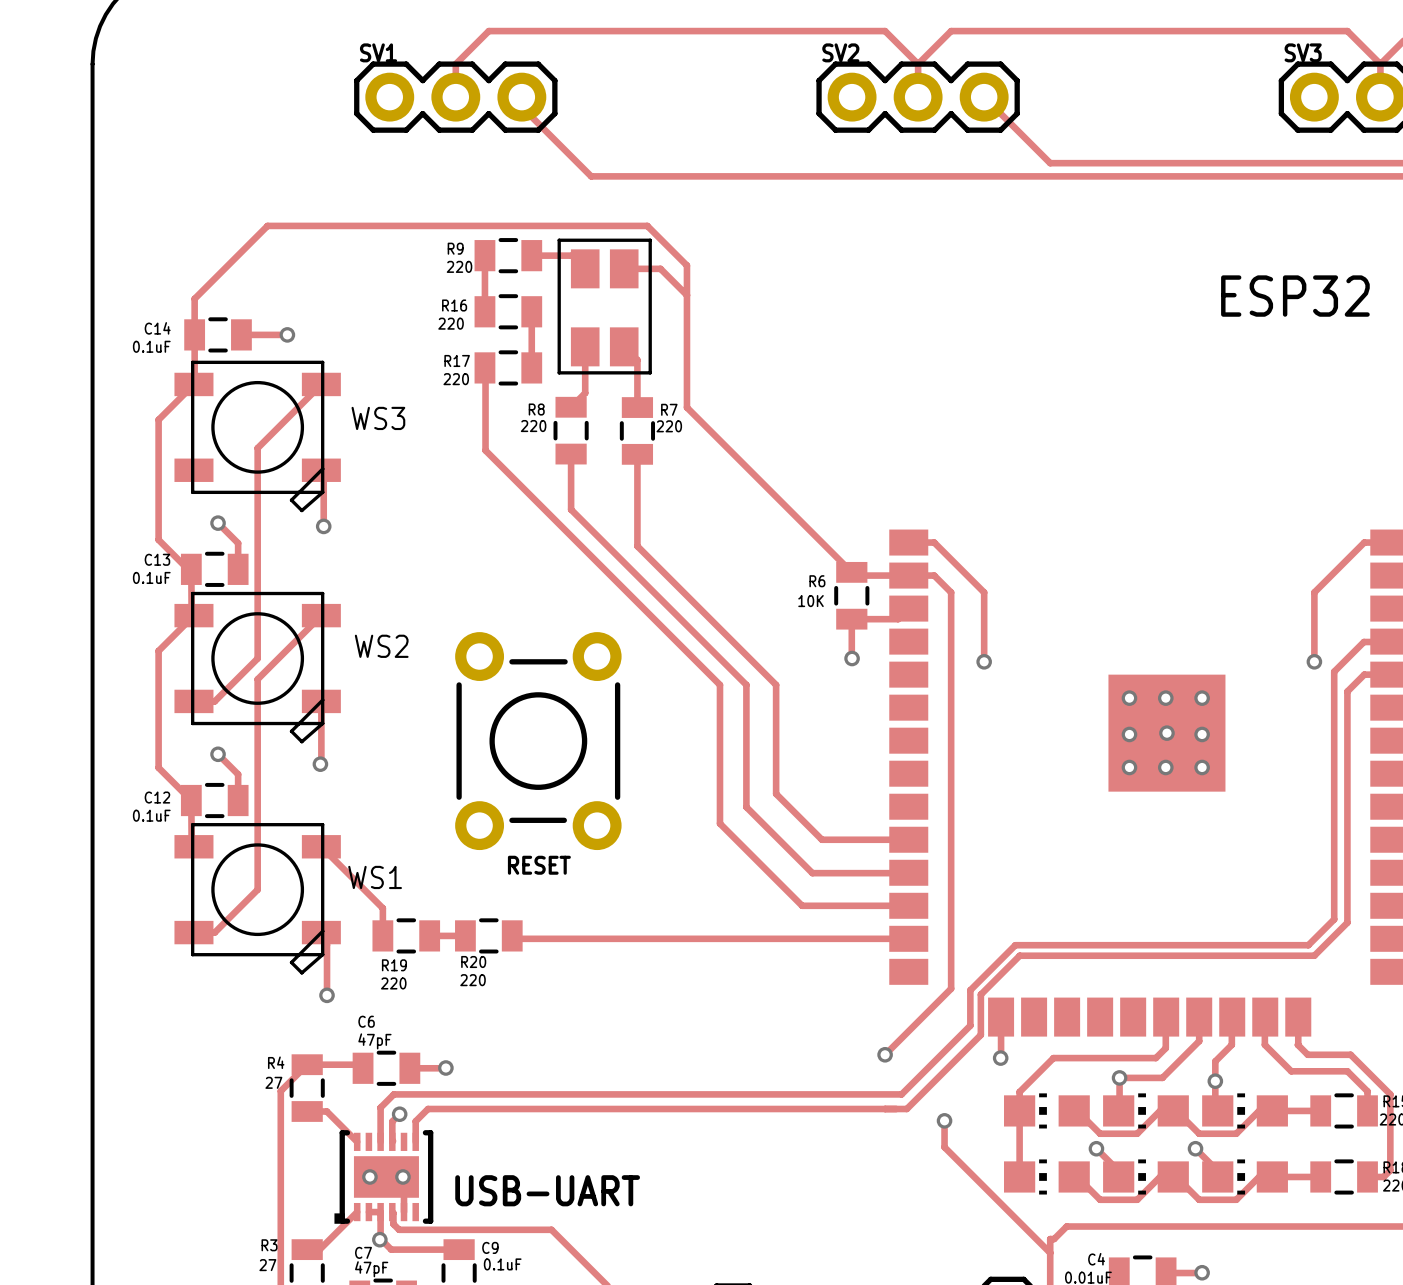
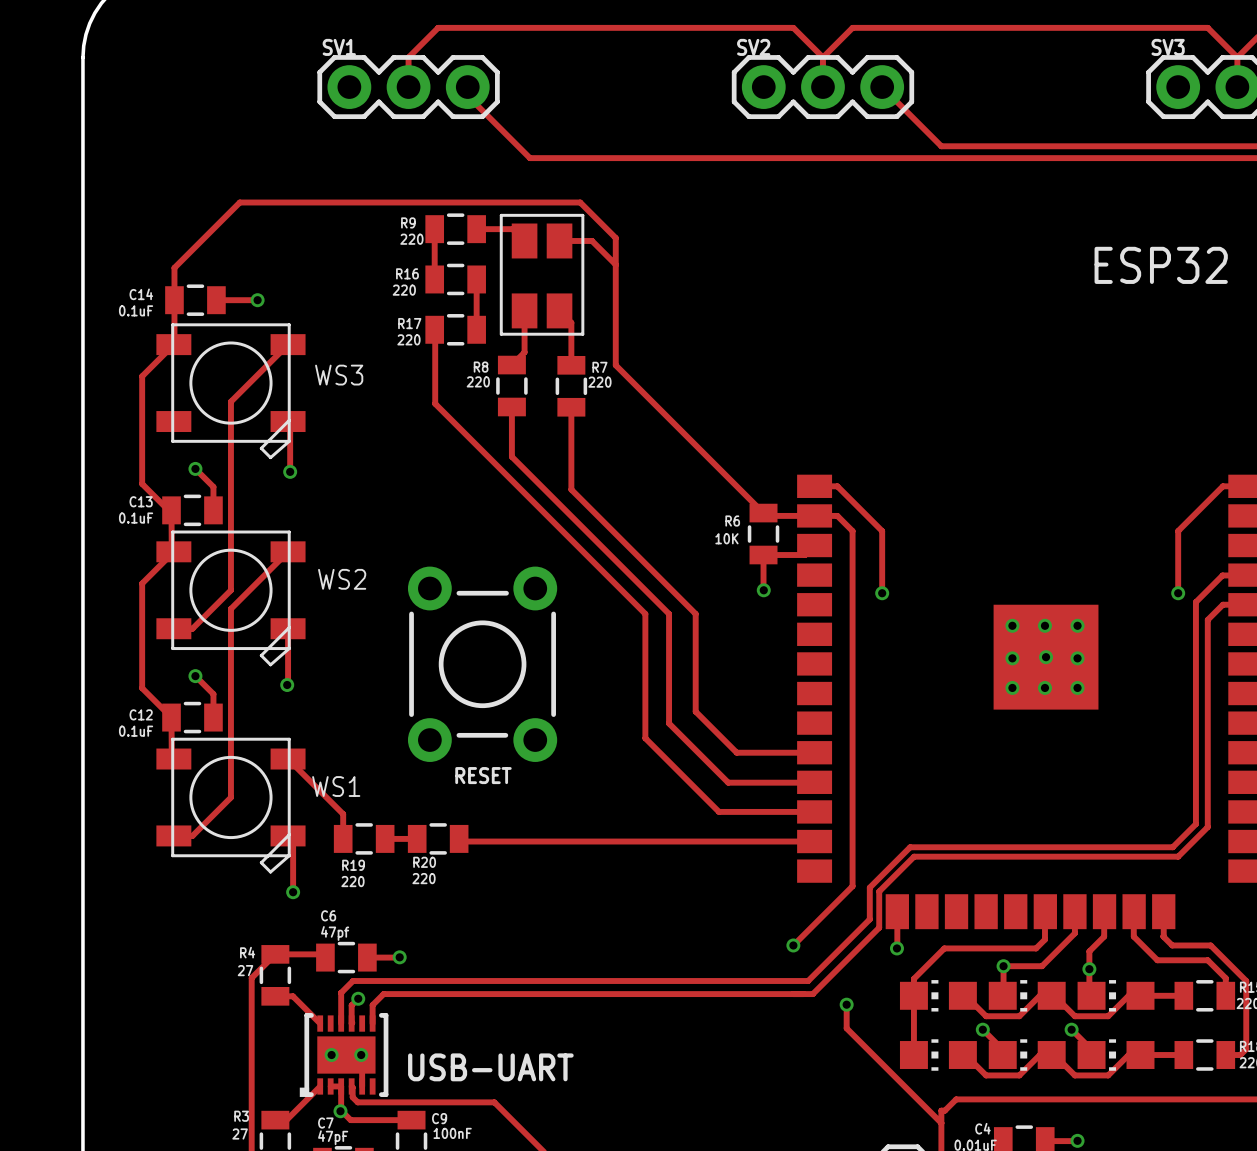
C6 value: 47pF (374, 1041) -> 47pf (335, 933)
C9 value: 0.1uF (502, 1264) -> 100nF (452, 1133)

